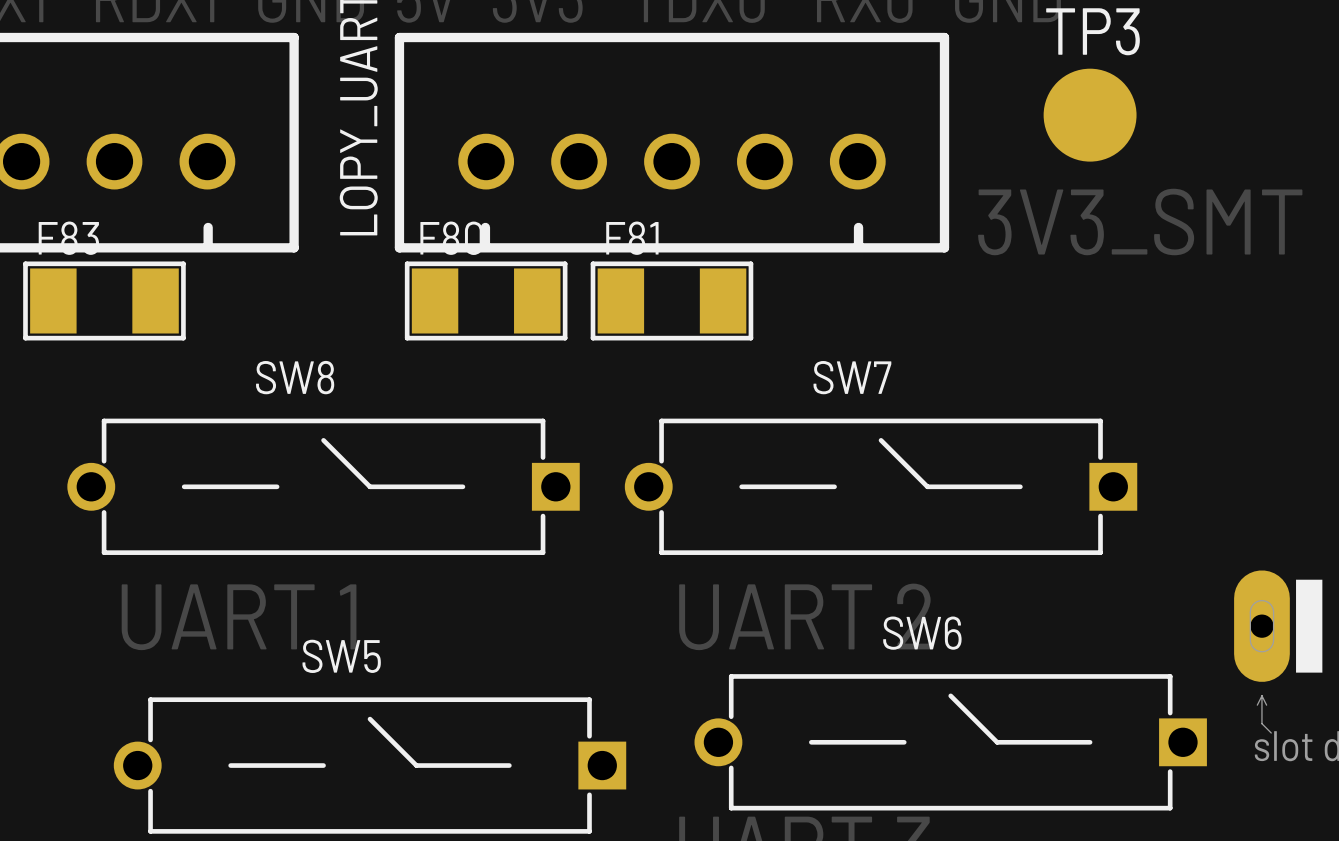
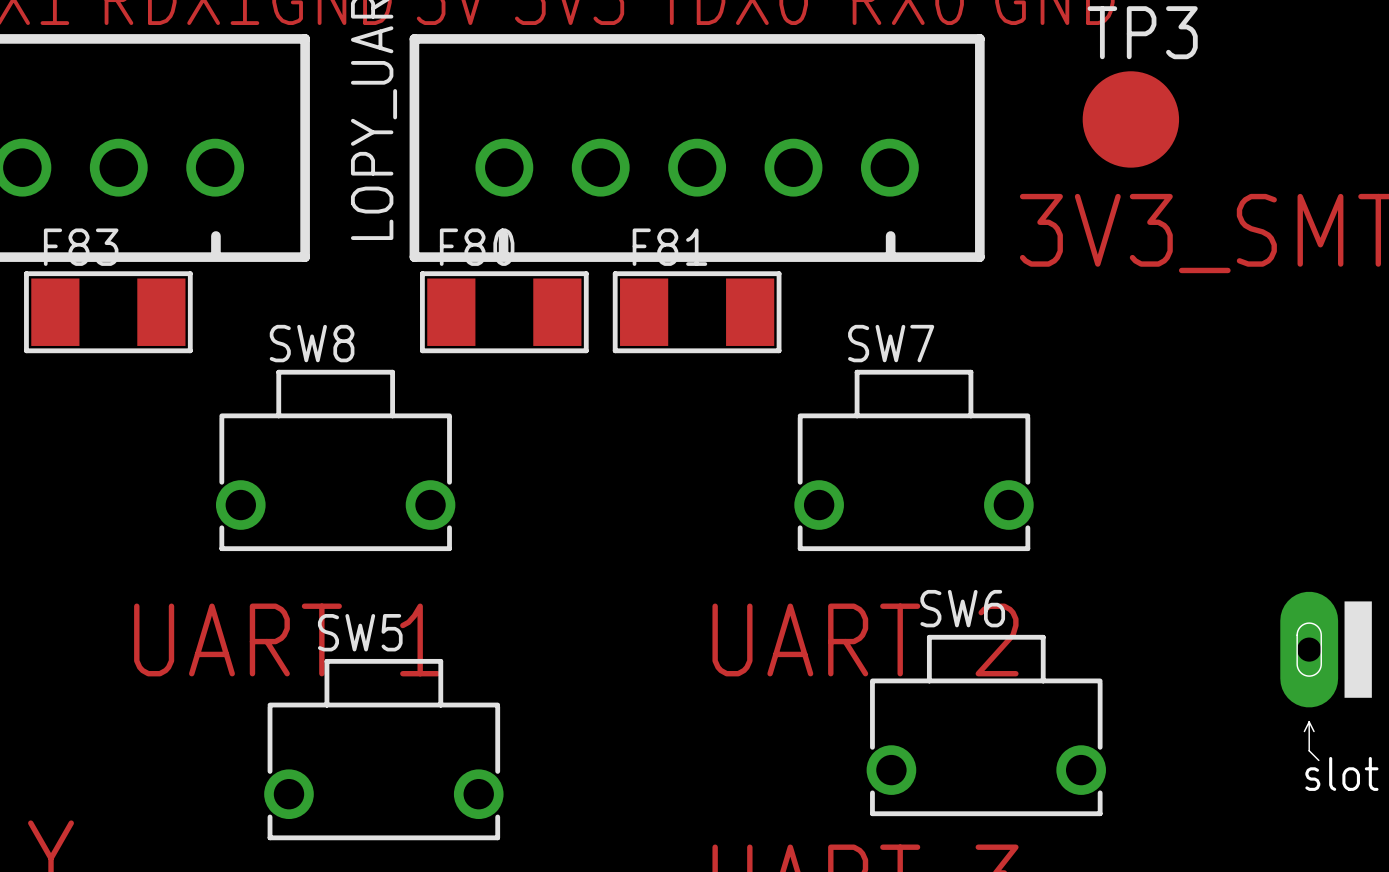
SW8 footprint: [67, 418, 580, 555] -> [215, 369, 456, 552]
SW7 footprint: [624, 418, 1138, 555] -> [794, 369, 1034, 552]
SW6 footprint: [694, 674, 1207, 811] -> [866, 634, 1106, 817]
SW5 footprint: [113, 697, 627, 834] -> [264, 658, 504, 841]

